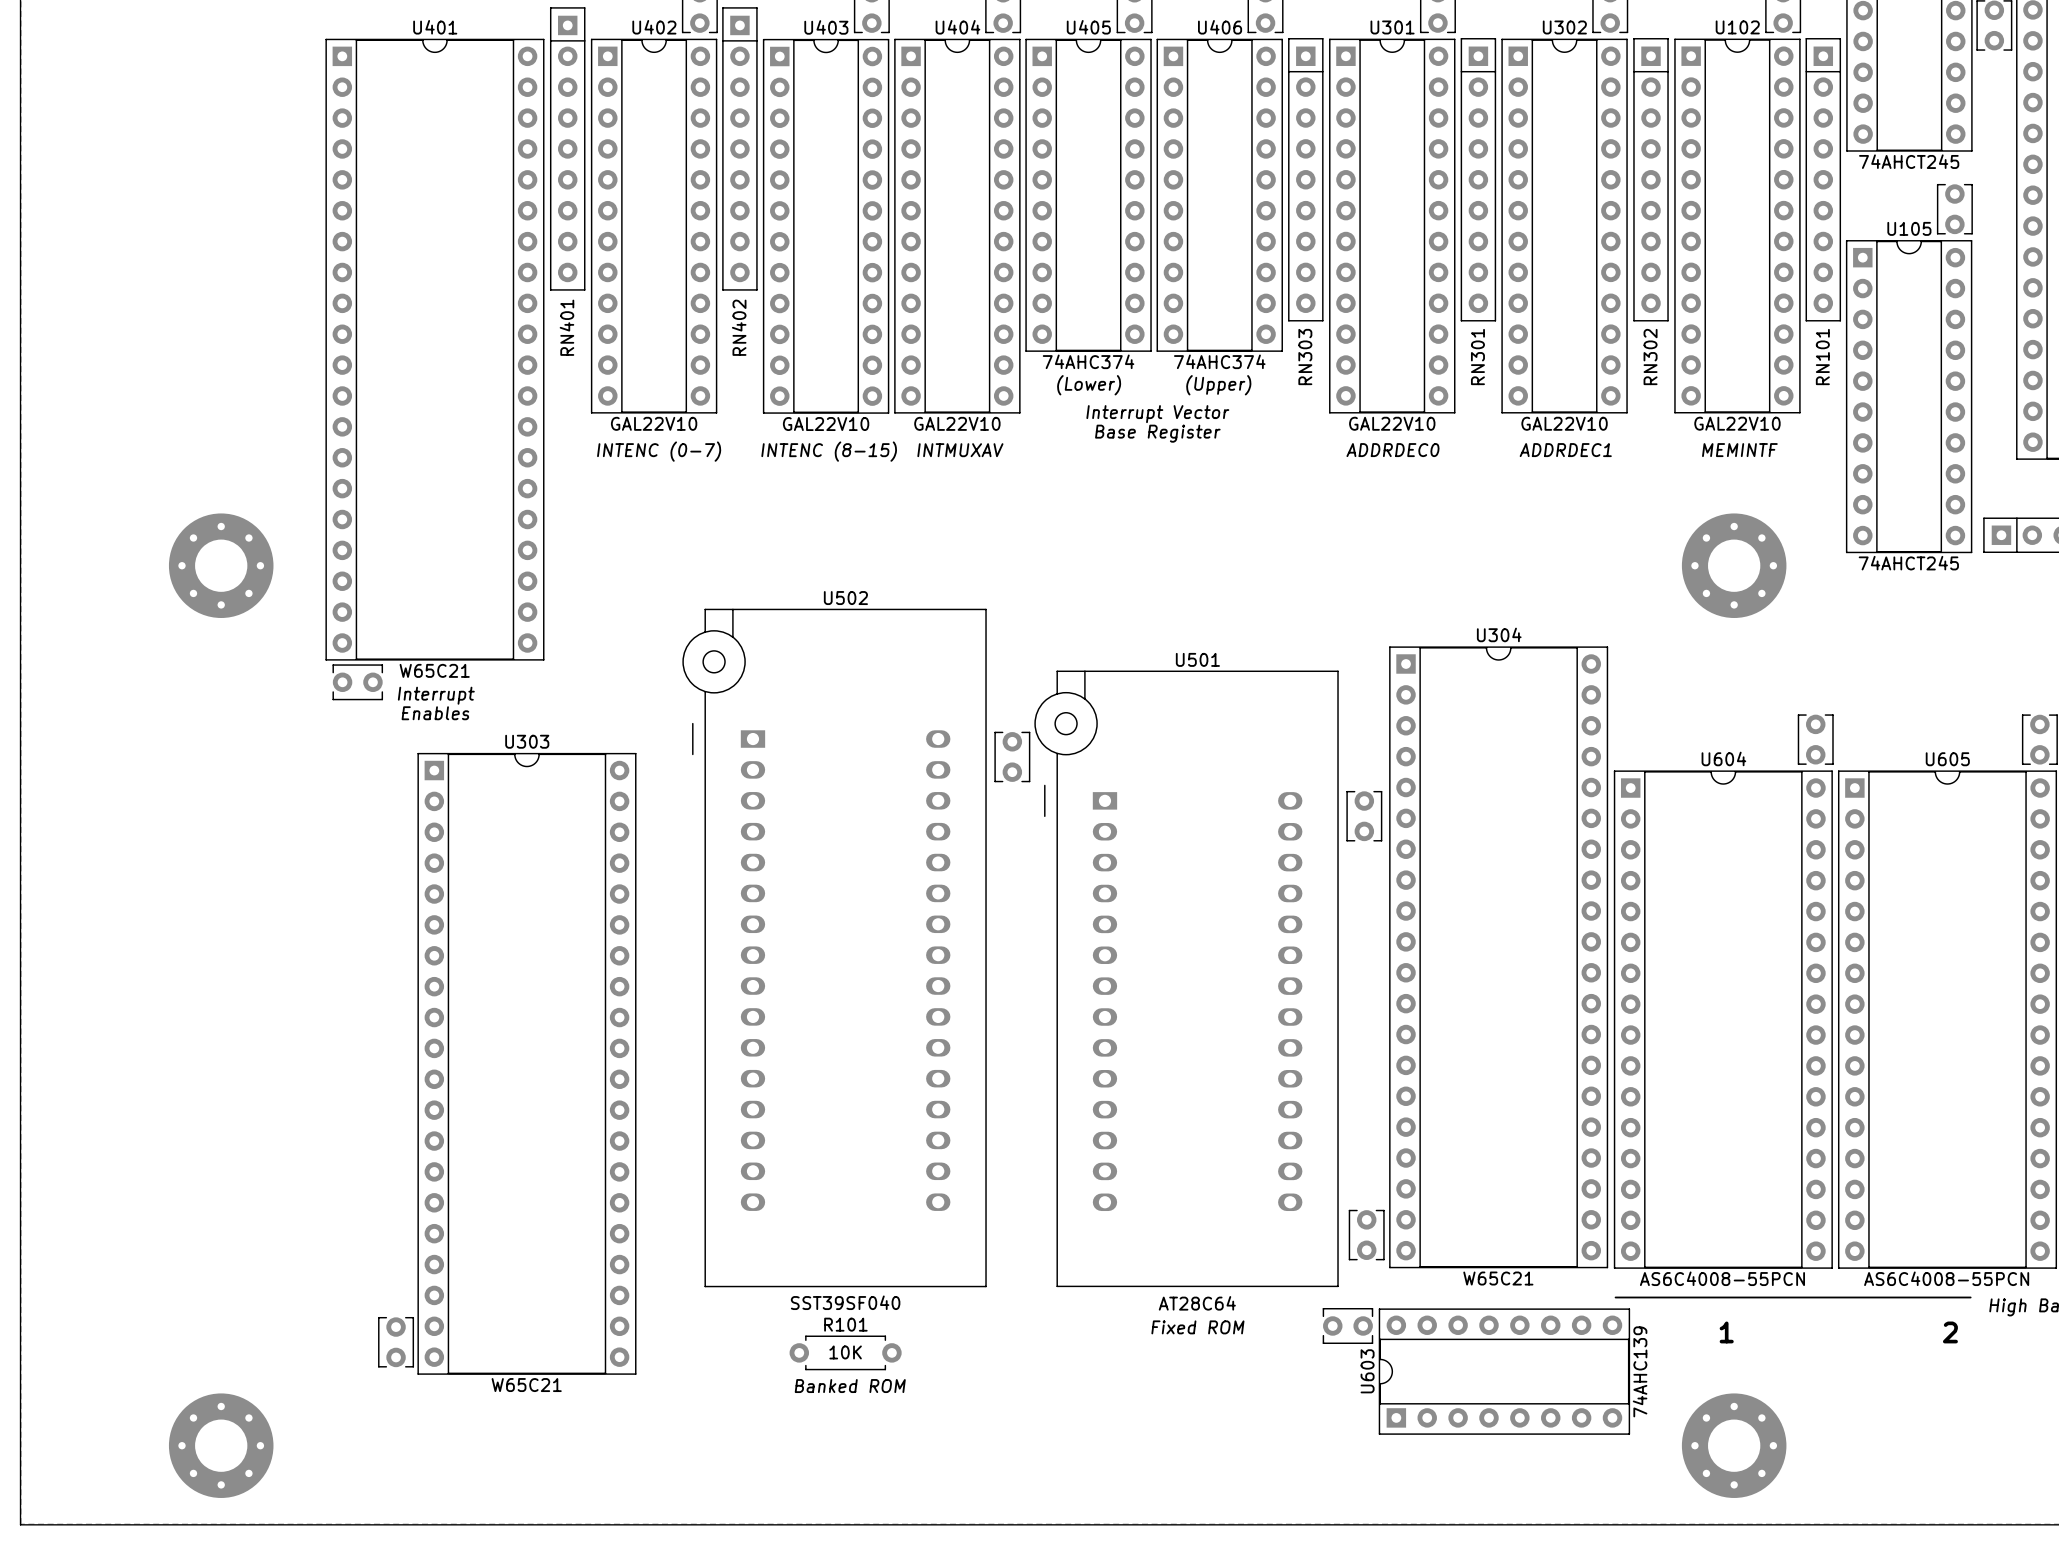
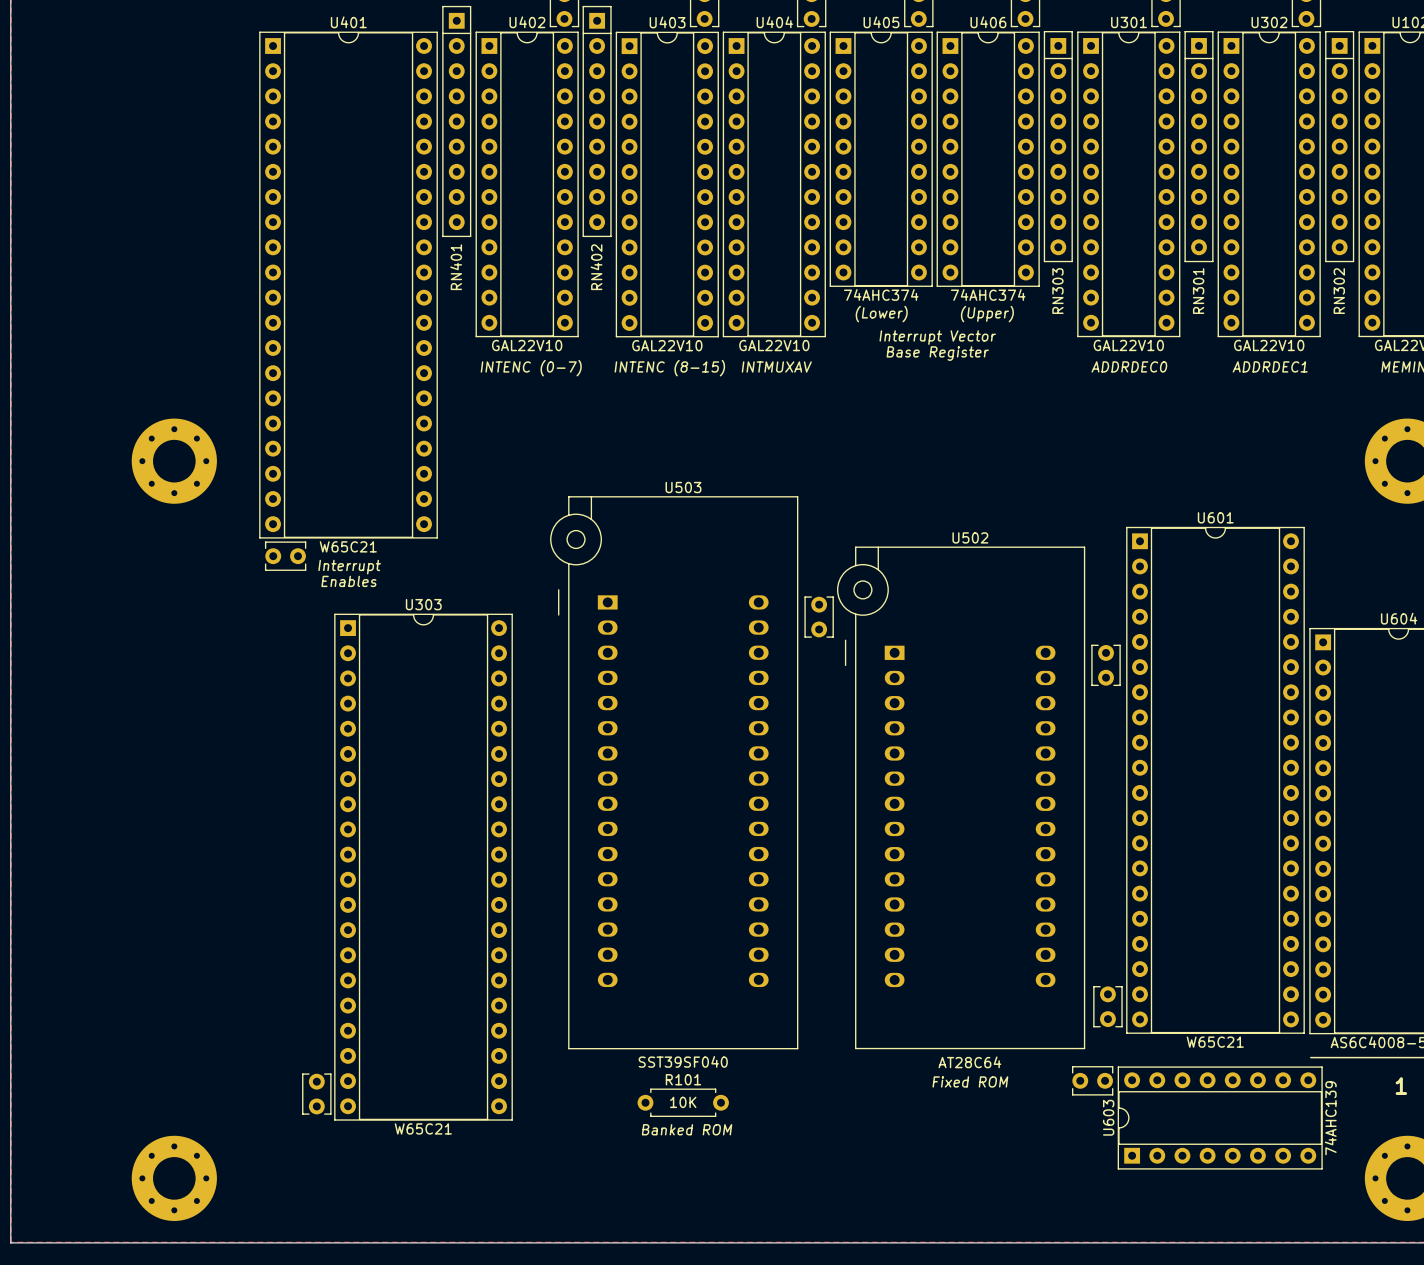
U502 name: U502 (845, 598) -> U503 (683, 487)
U304 name: U304 (1499, 634) -> U601 (1215, 517)
U501 name: U501 (1197, 659) -> U502 (970, 537)

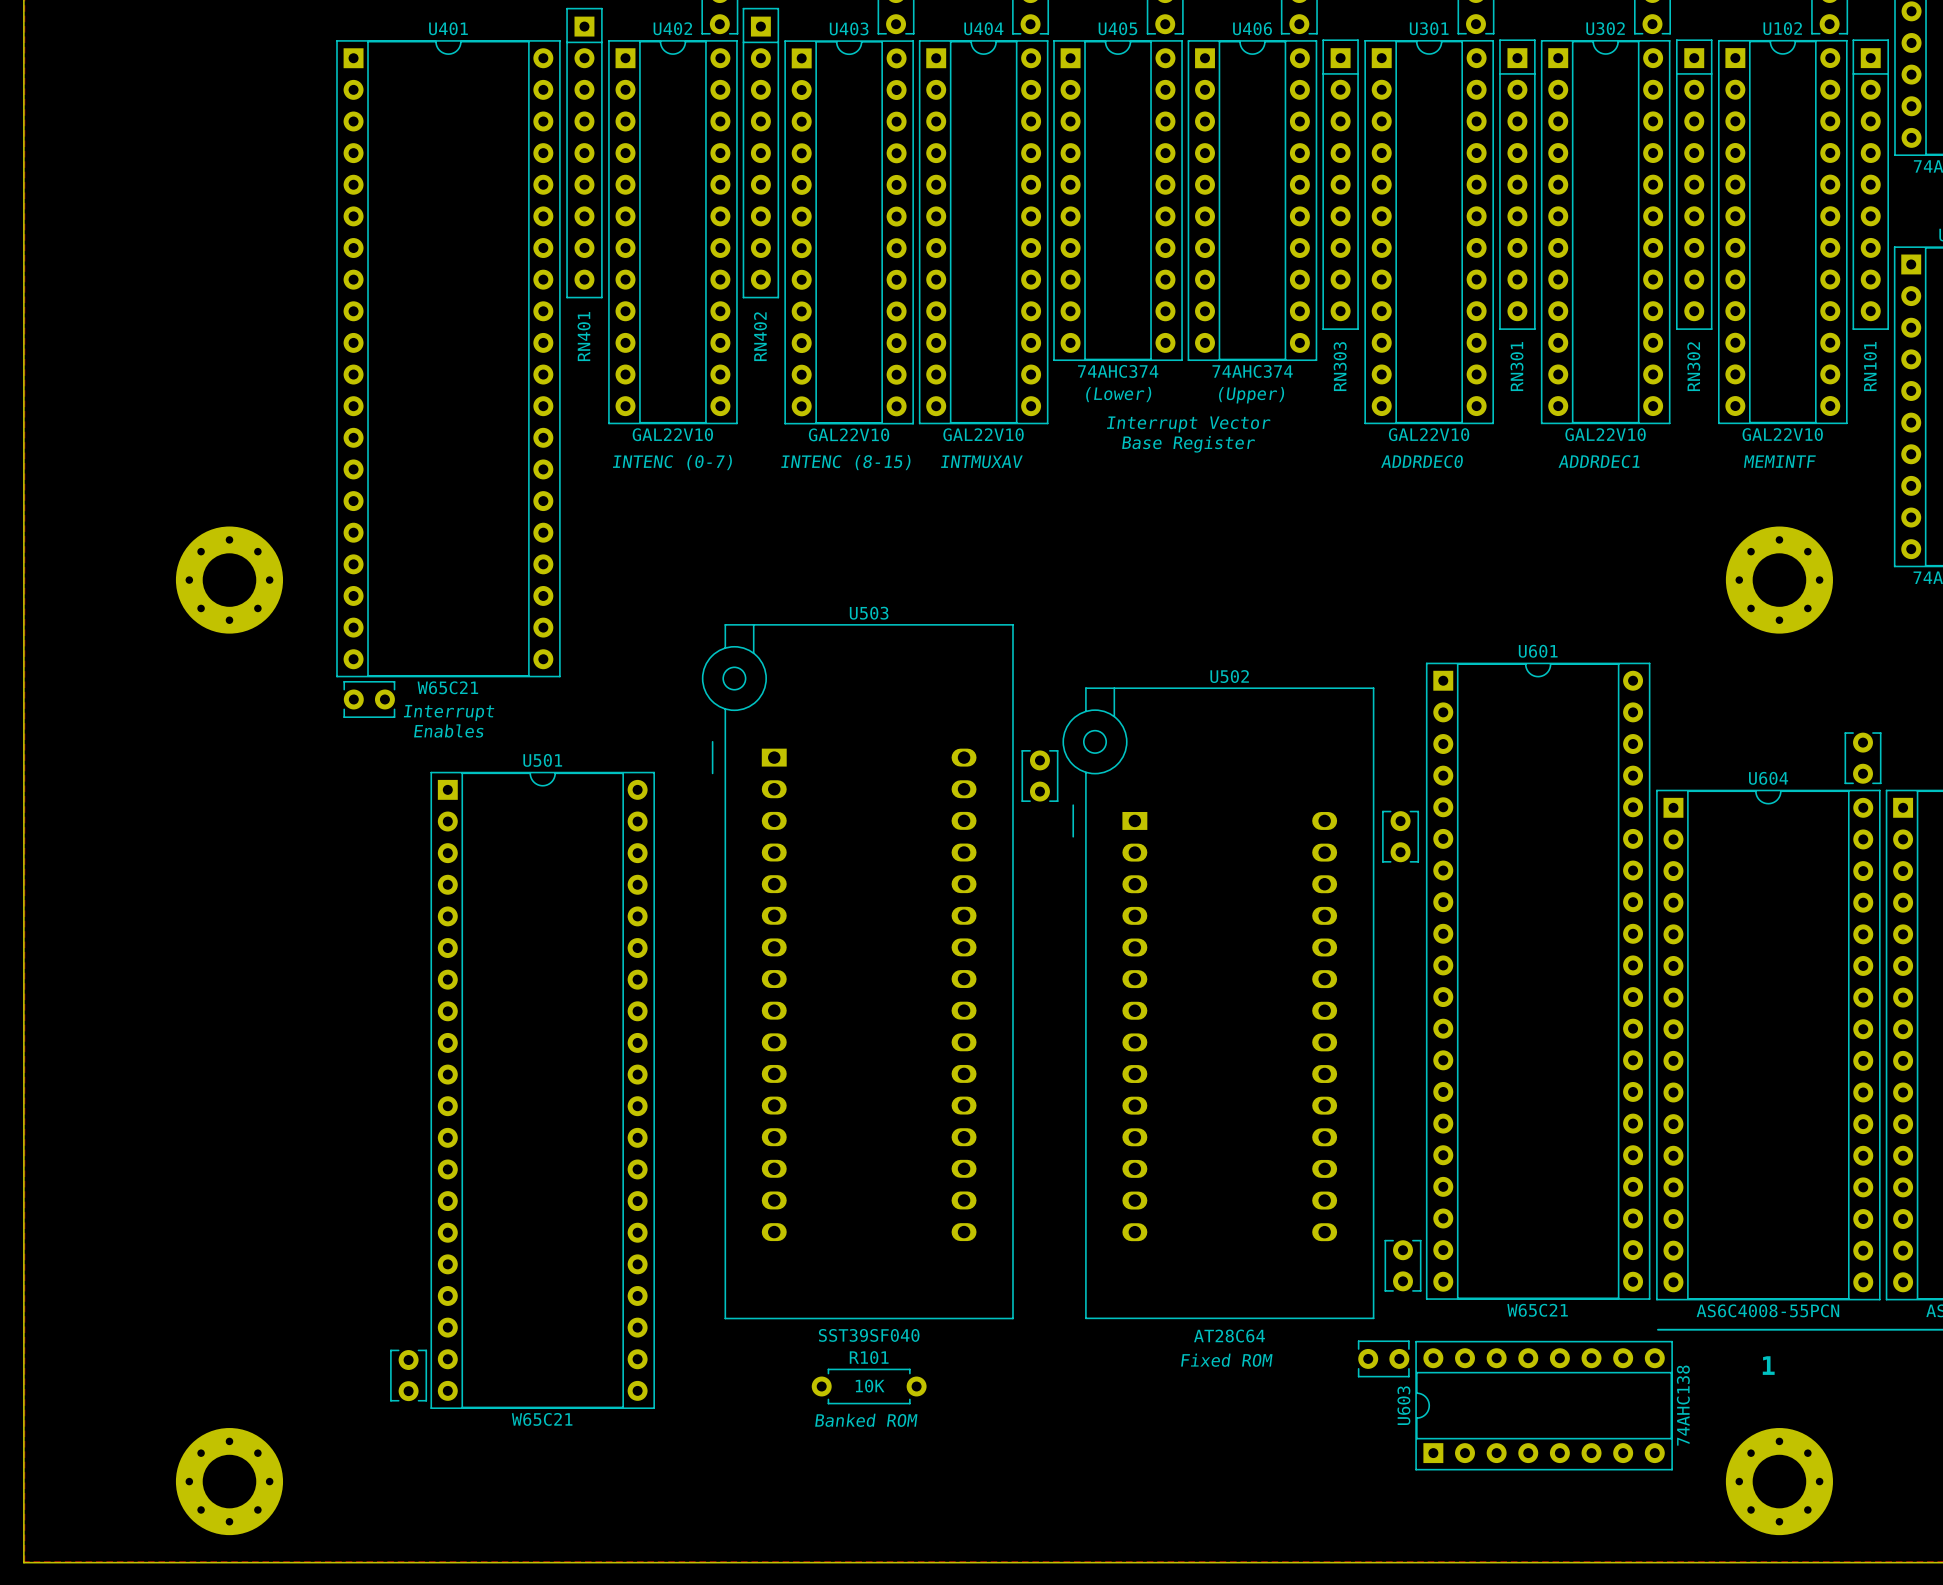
U303 name: U303 (423, 604) -> U501 (542, 760)
U603 value: 74AHC139 (1330, 1118) -> 74AHC138 (1683, 1405)

